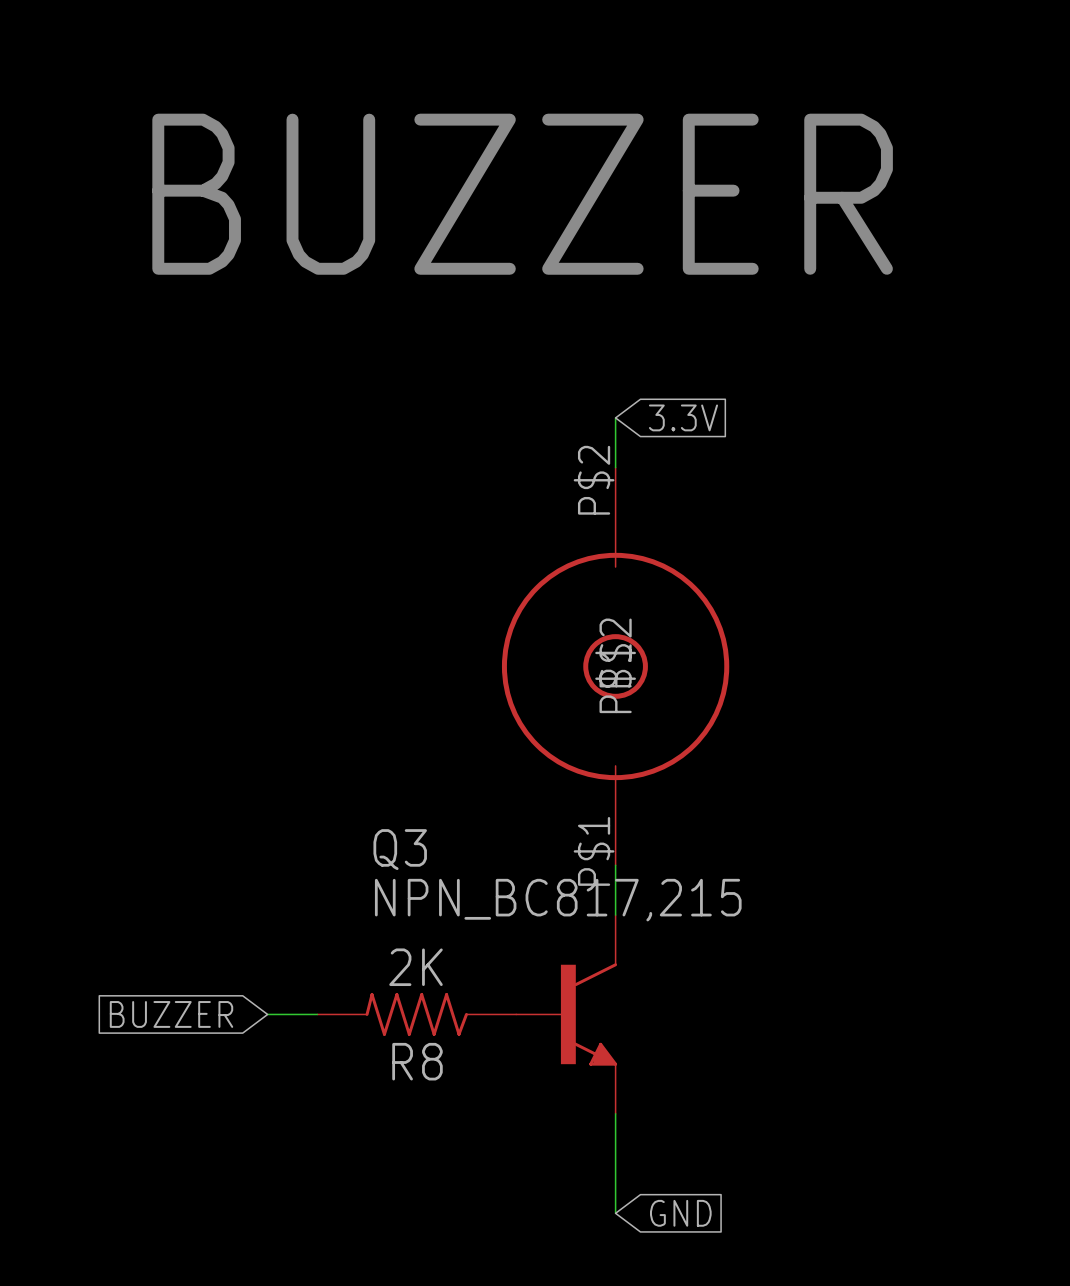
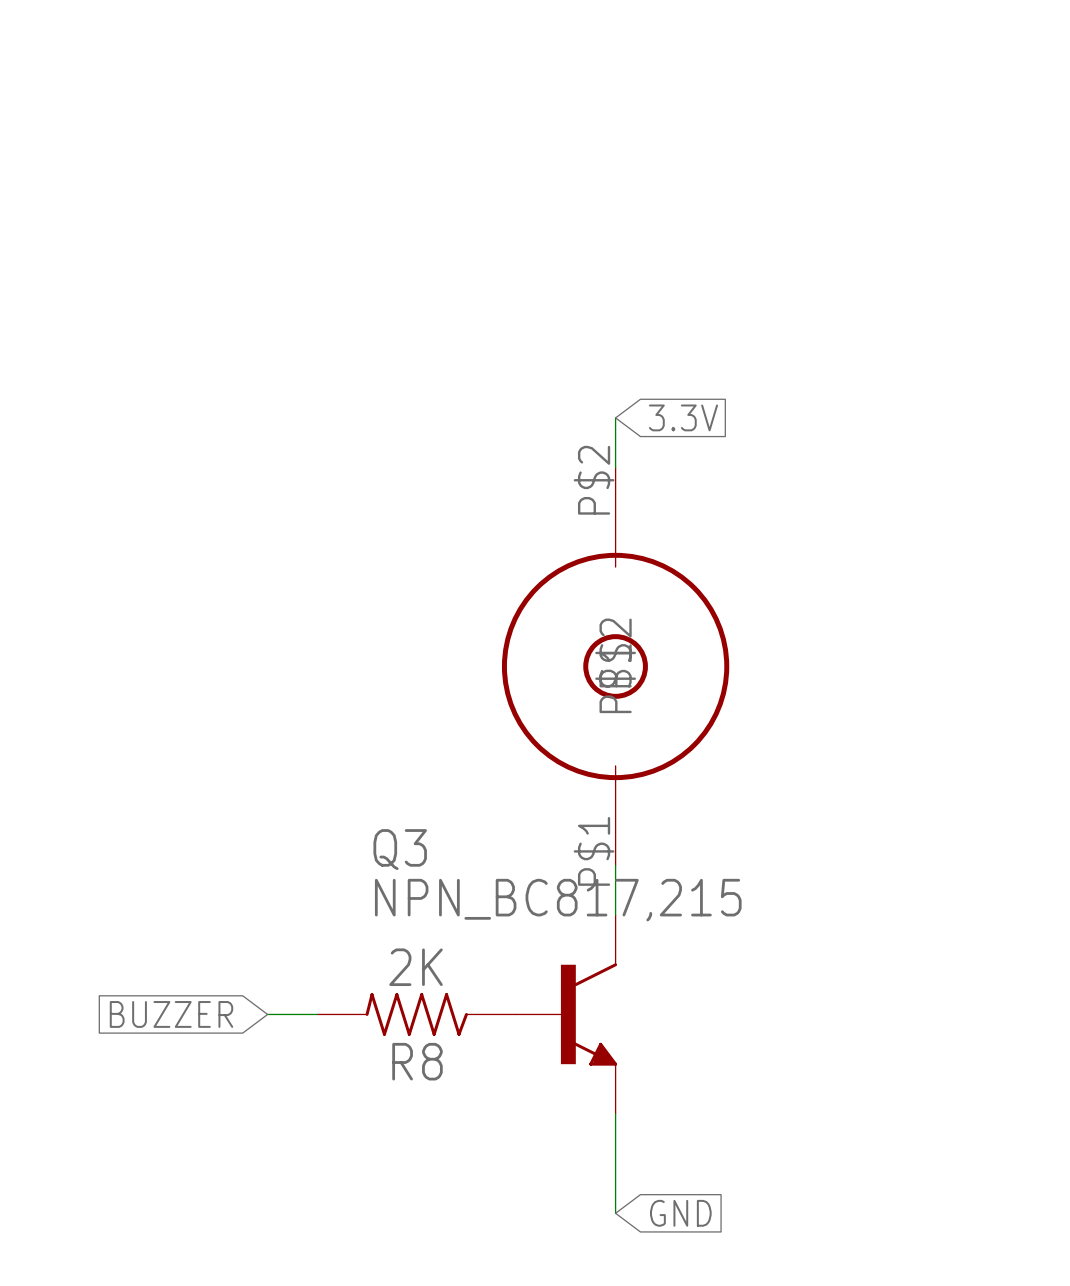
text: BUZZER (522, 194) -> none

